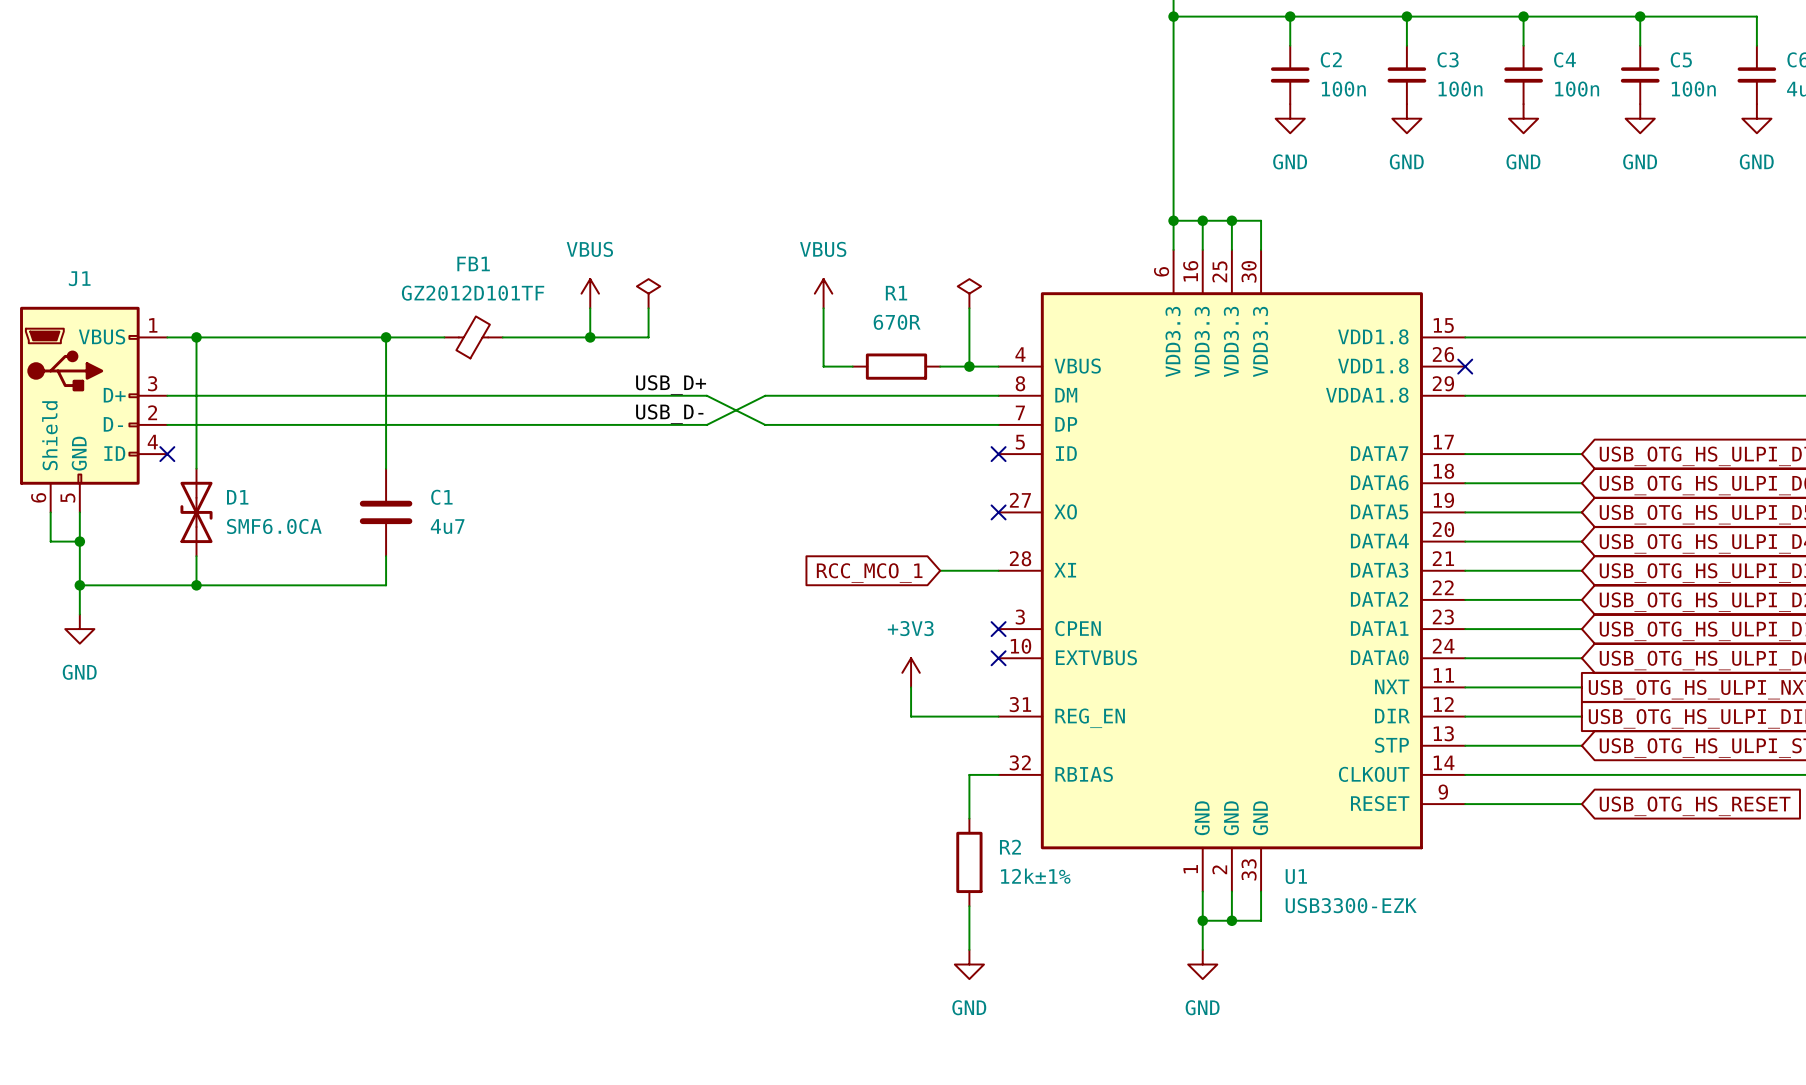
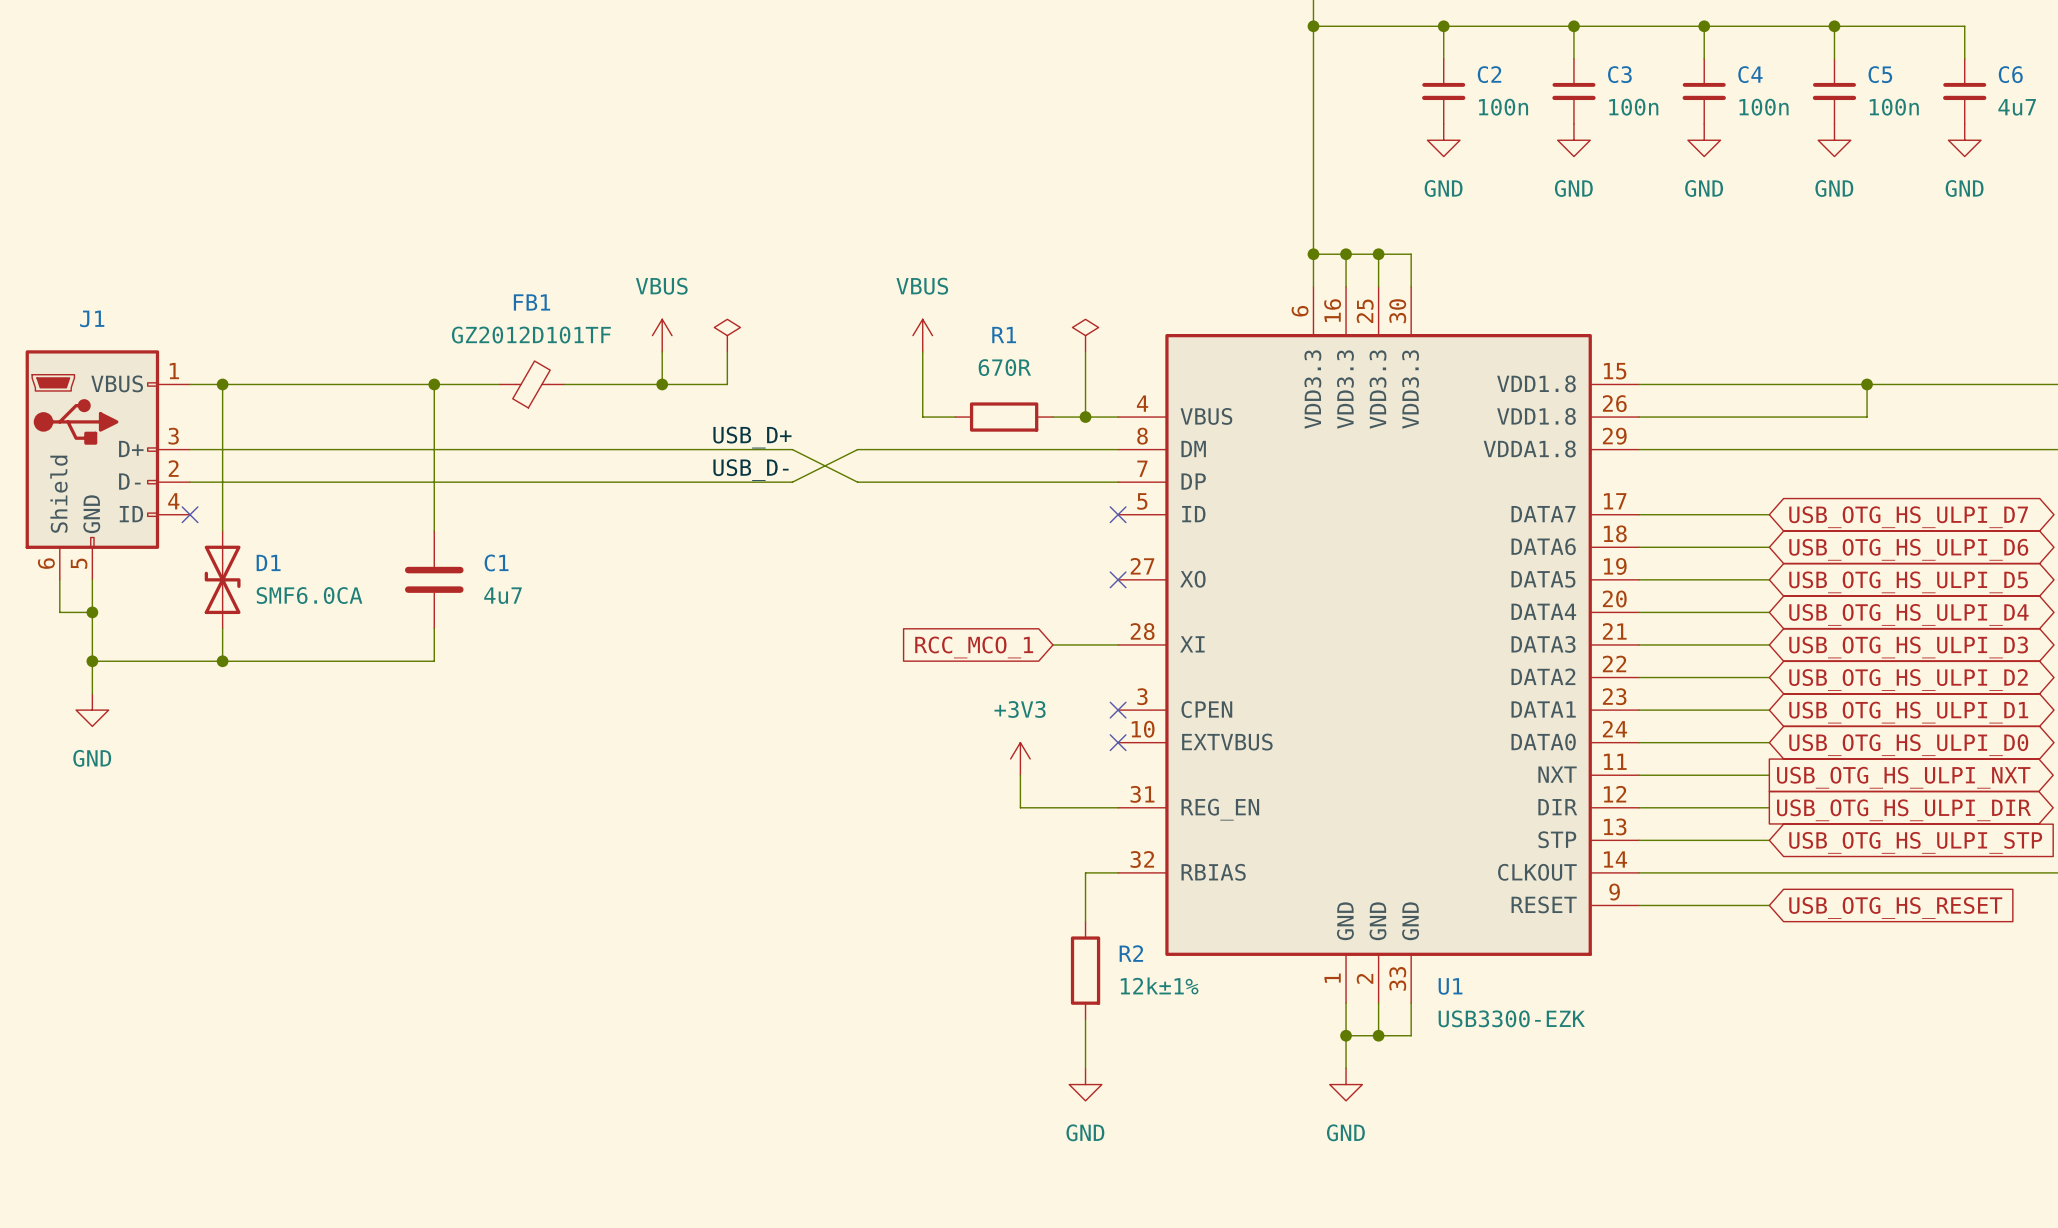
wire: none -> (1867, 384) (1867, 417) (1639, 417)
junction: none -> (1867, 384)
no-connect mark: (1465, 366) -> none

